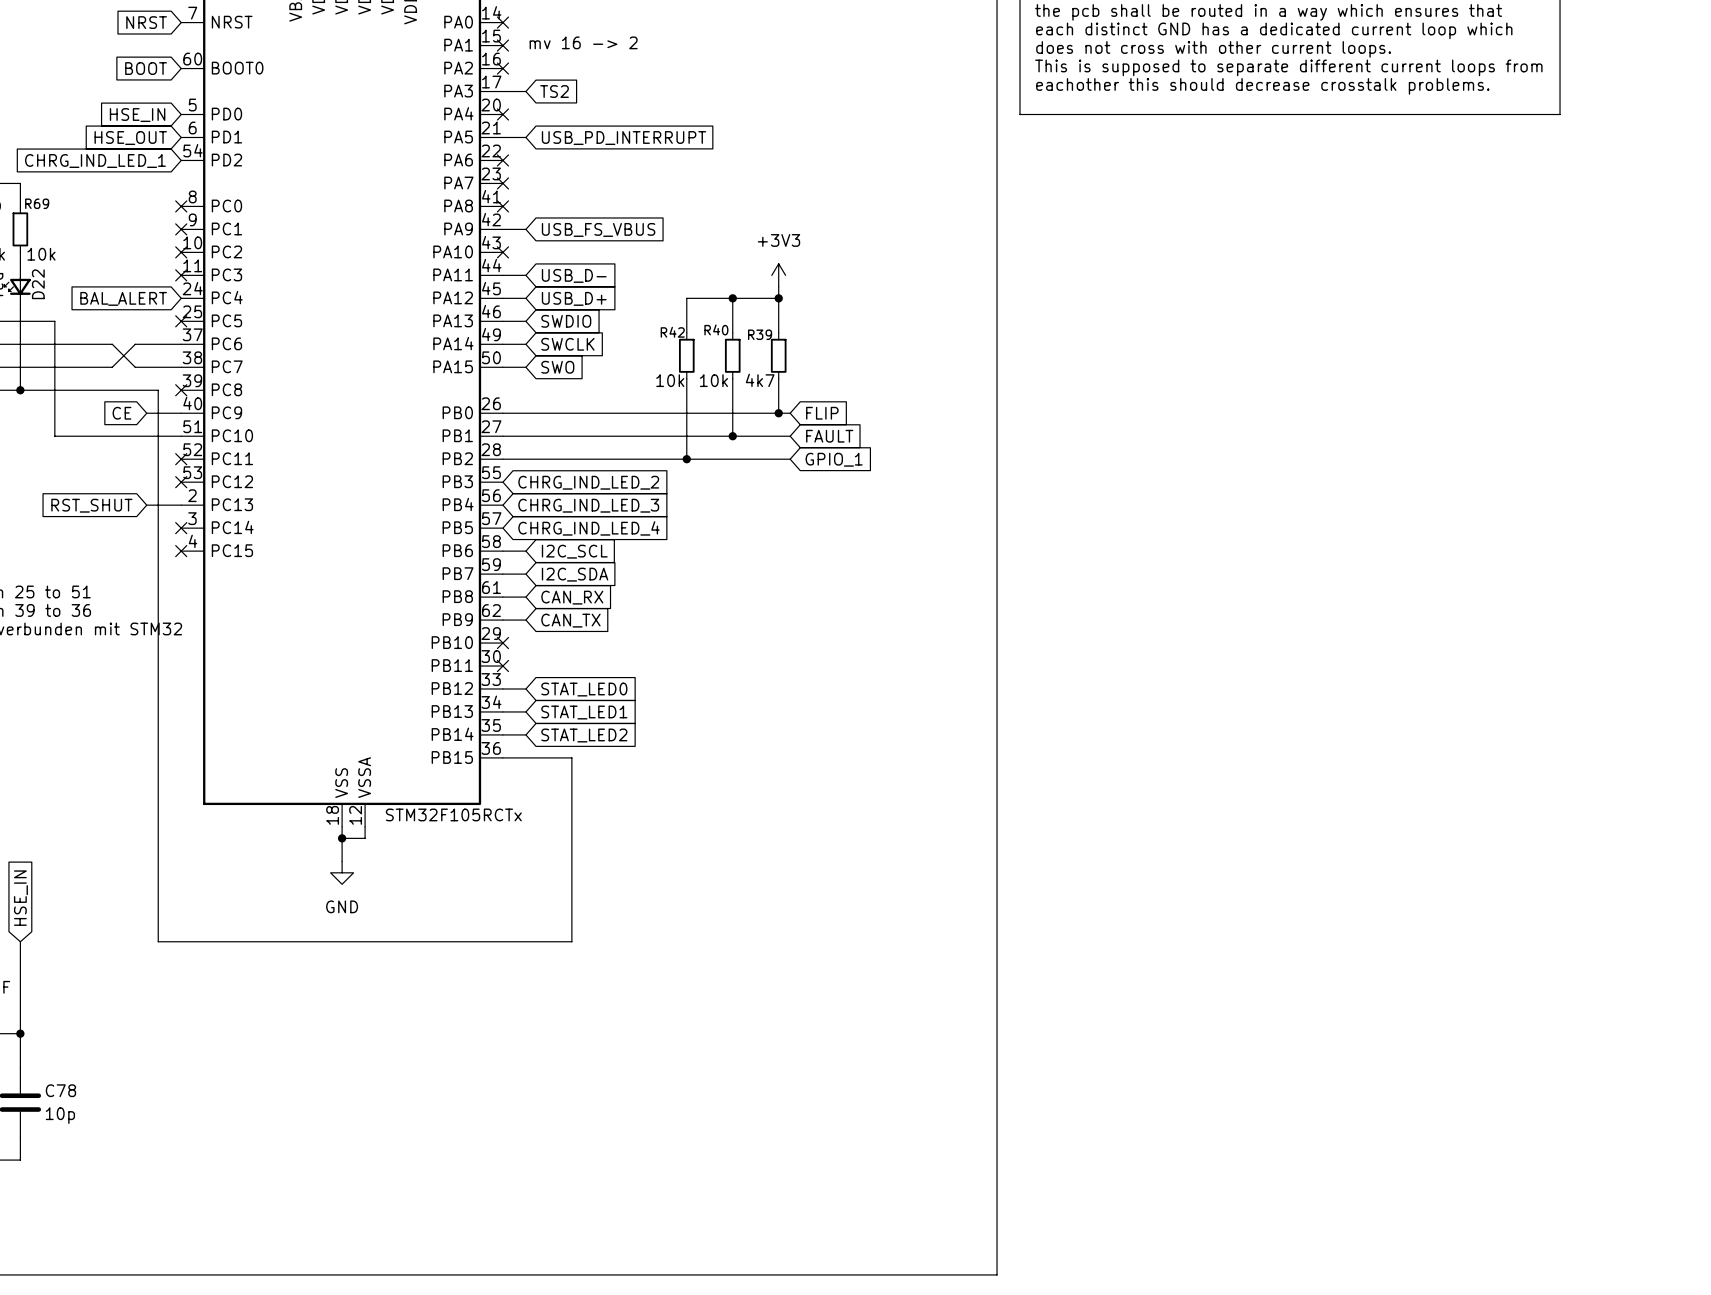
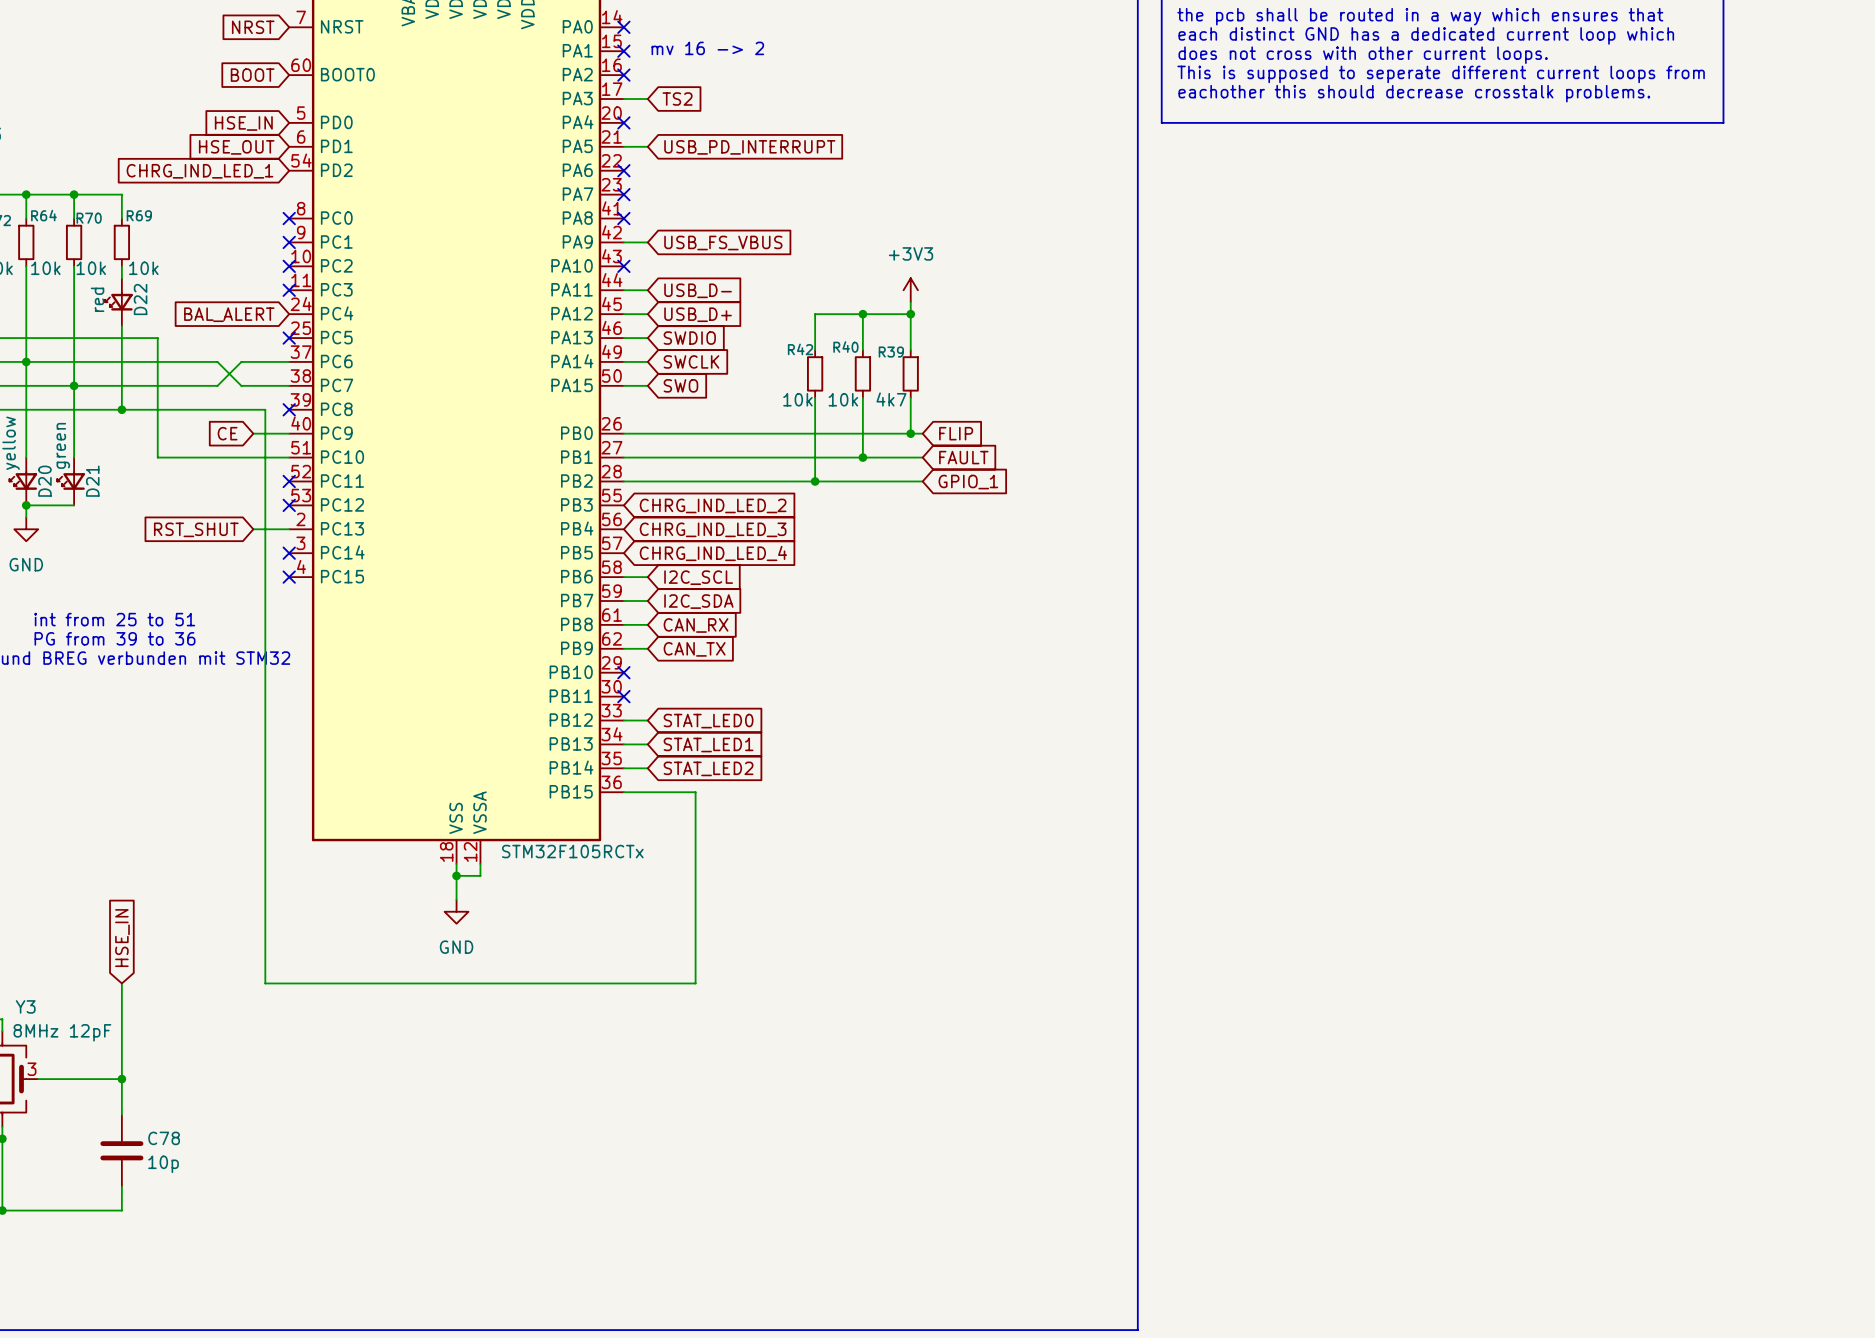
text: This is supposed to separate different current loops from (1288, 67) -> This is supposed to seperate different current loops from (1441, 74)

